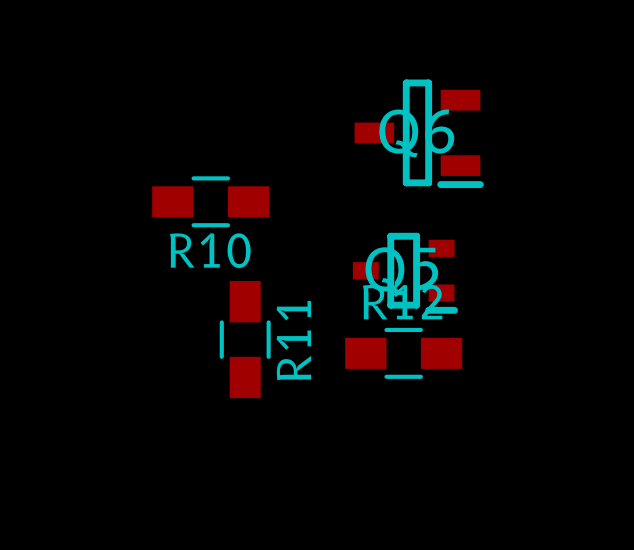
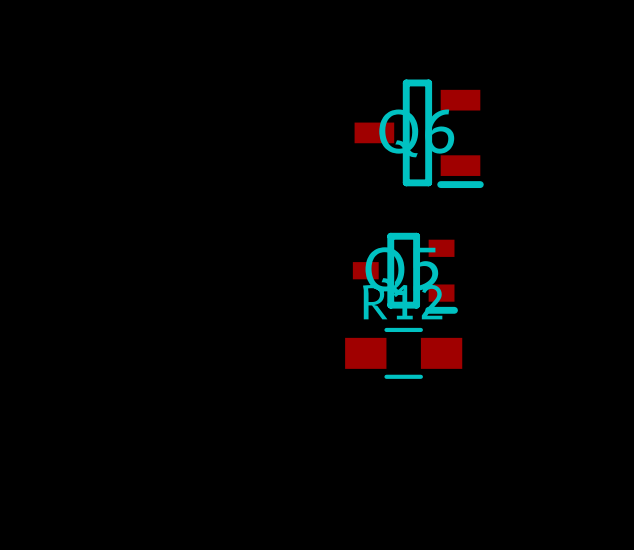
R10: (210, 201) -> none
R11: (245, 339) -> none

